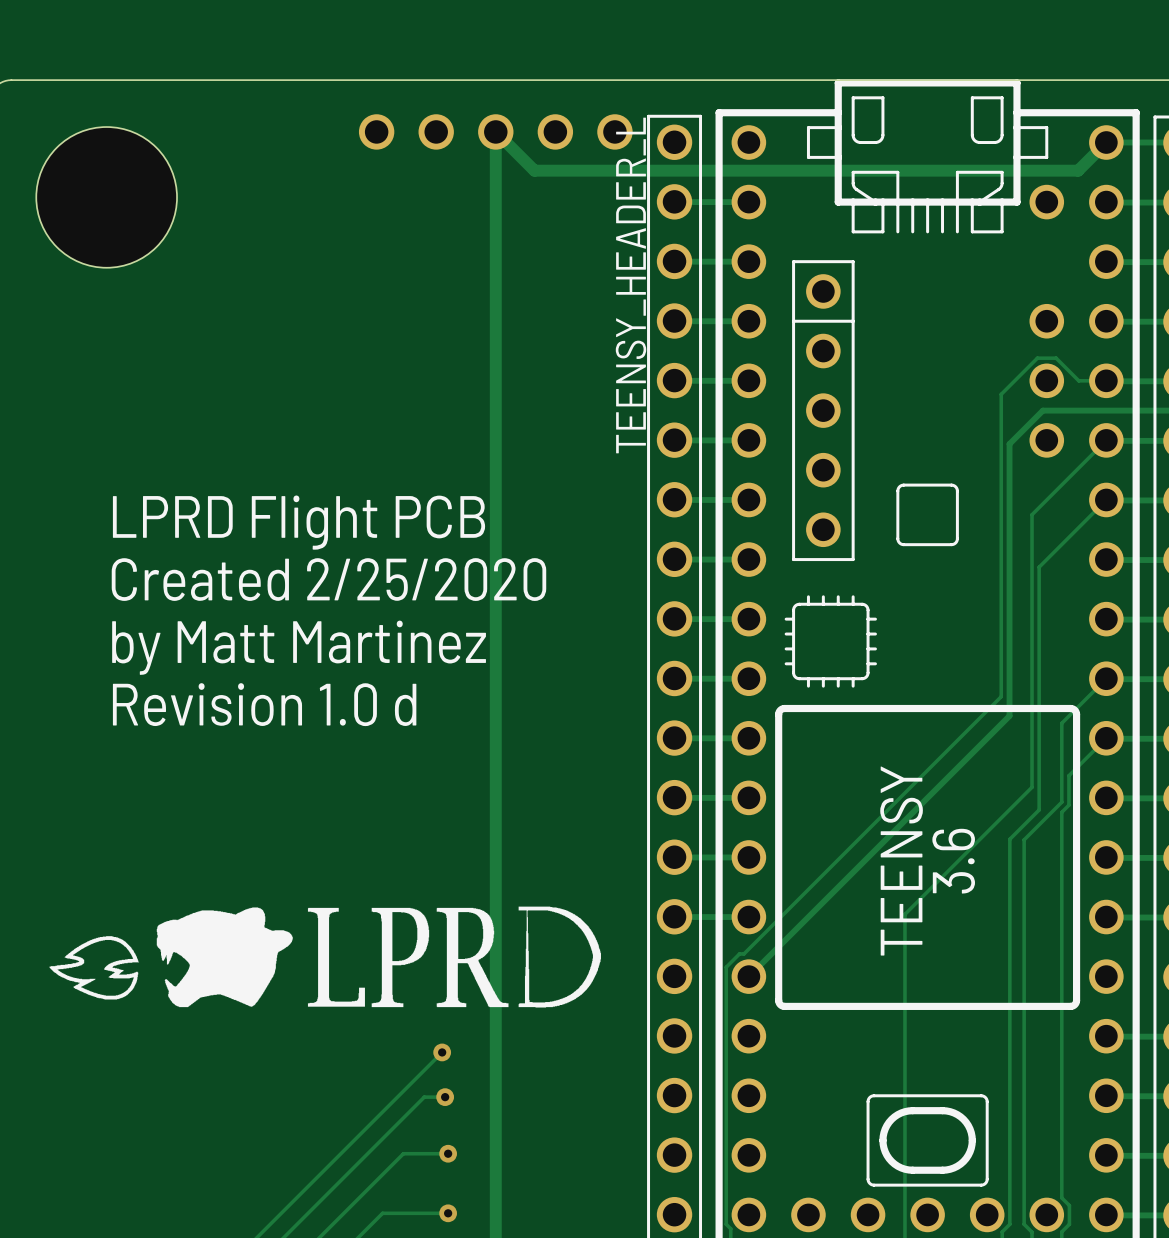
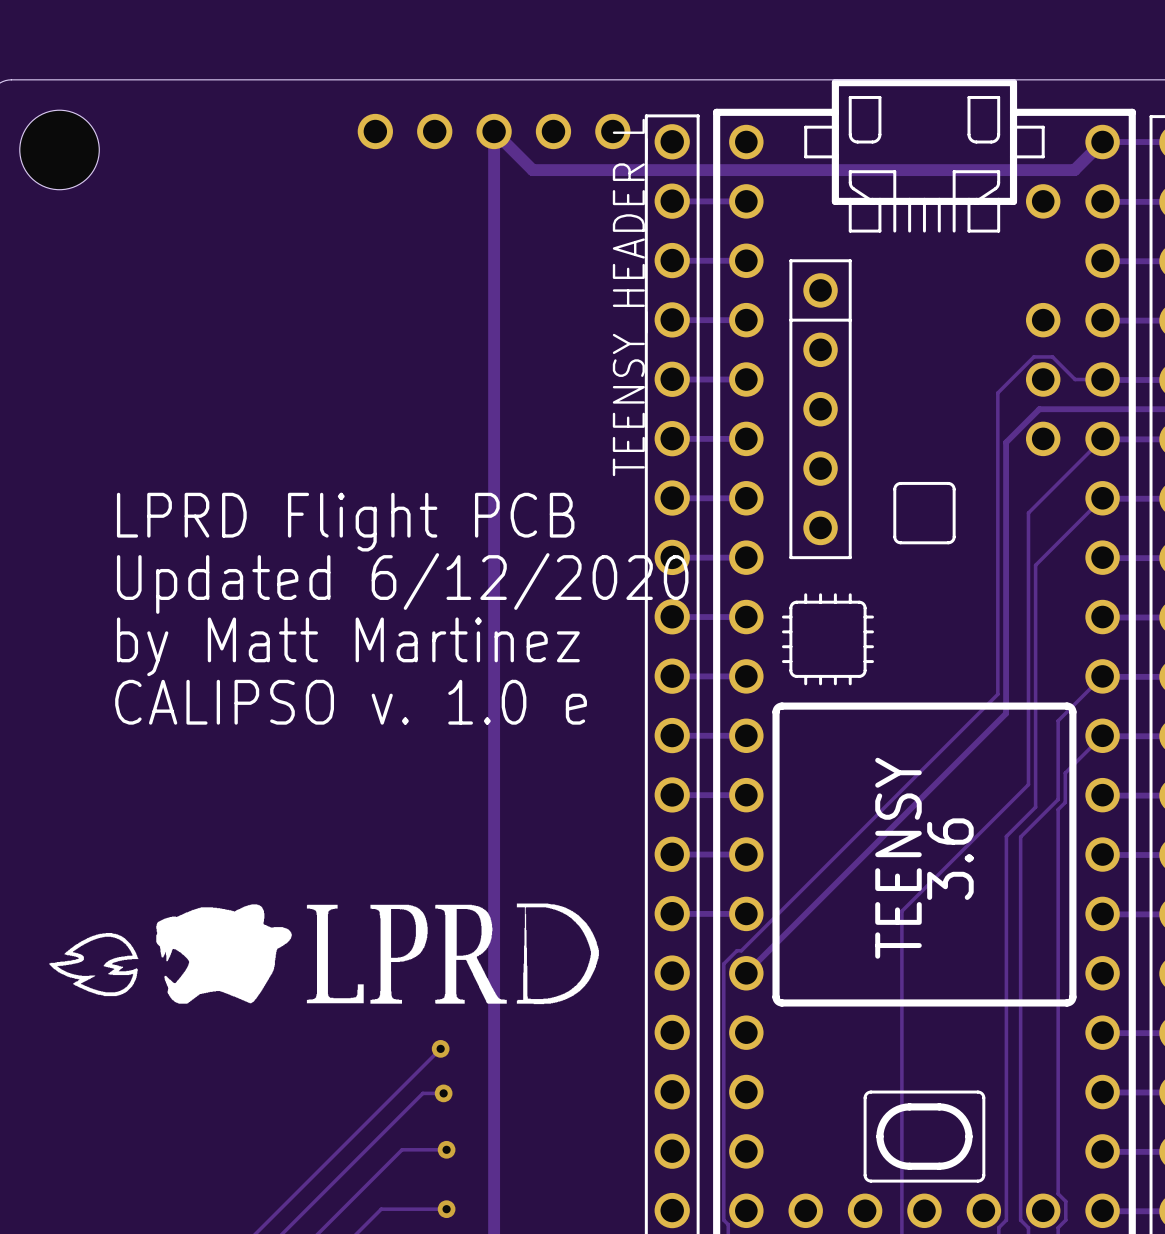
hole: none -> (59, 149)
hole: (106, 197) -> none
text: Created 2/25/2020 (328, 579) -> Updated 6/12/2020 (402, 583)
text: Revision 1.0 d (264, 704) -> CALIPSO v. 1.0 e (351, 702)

